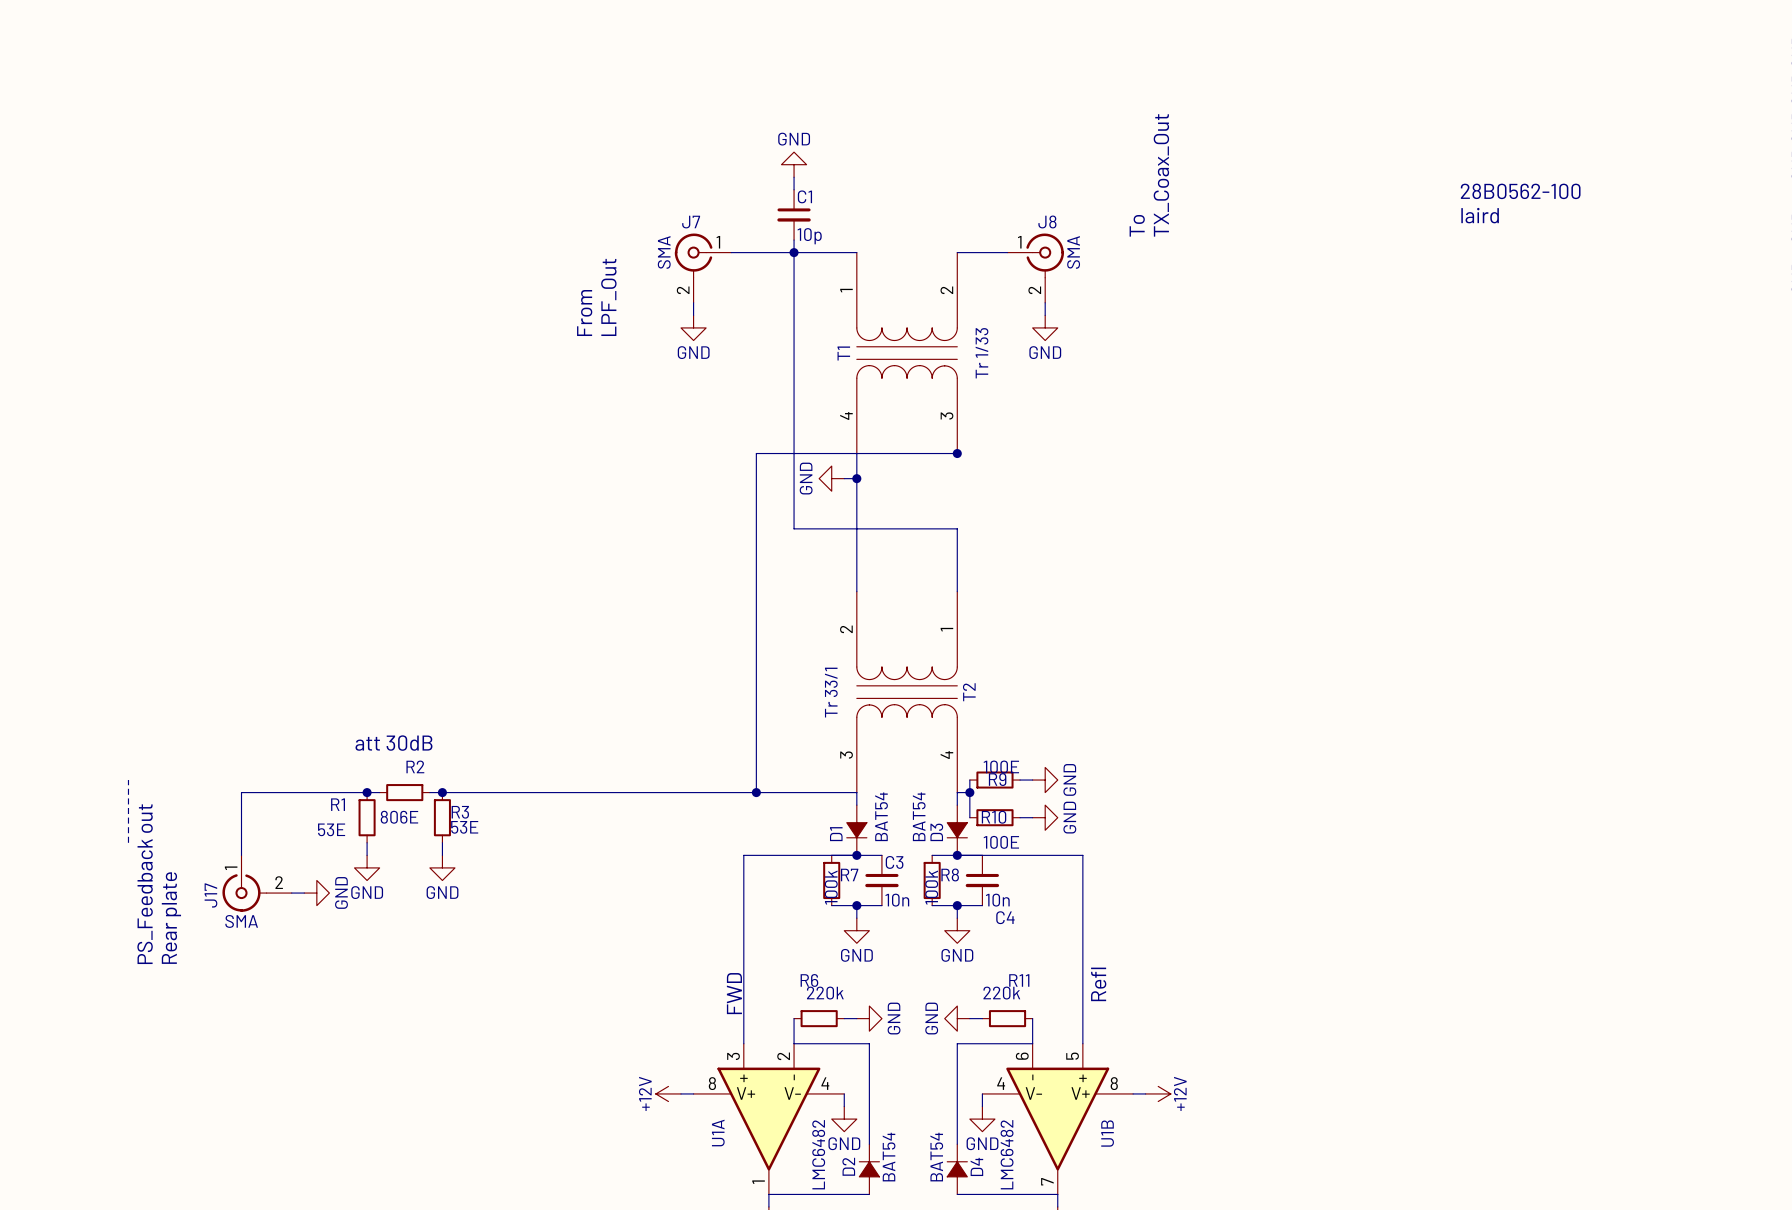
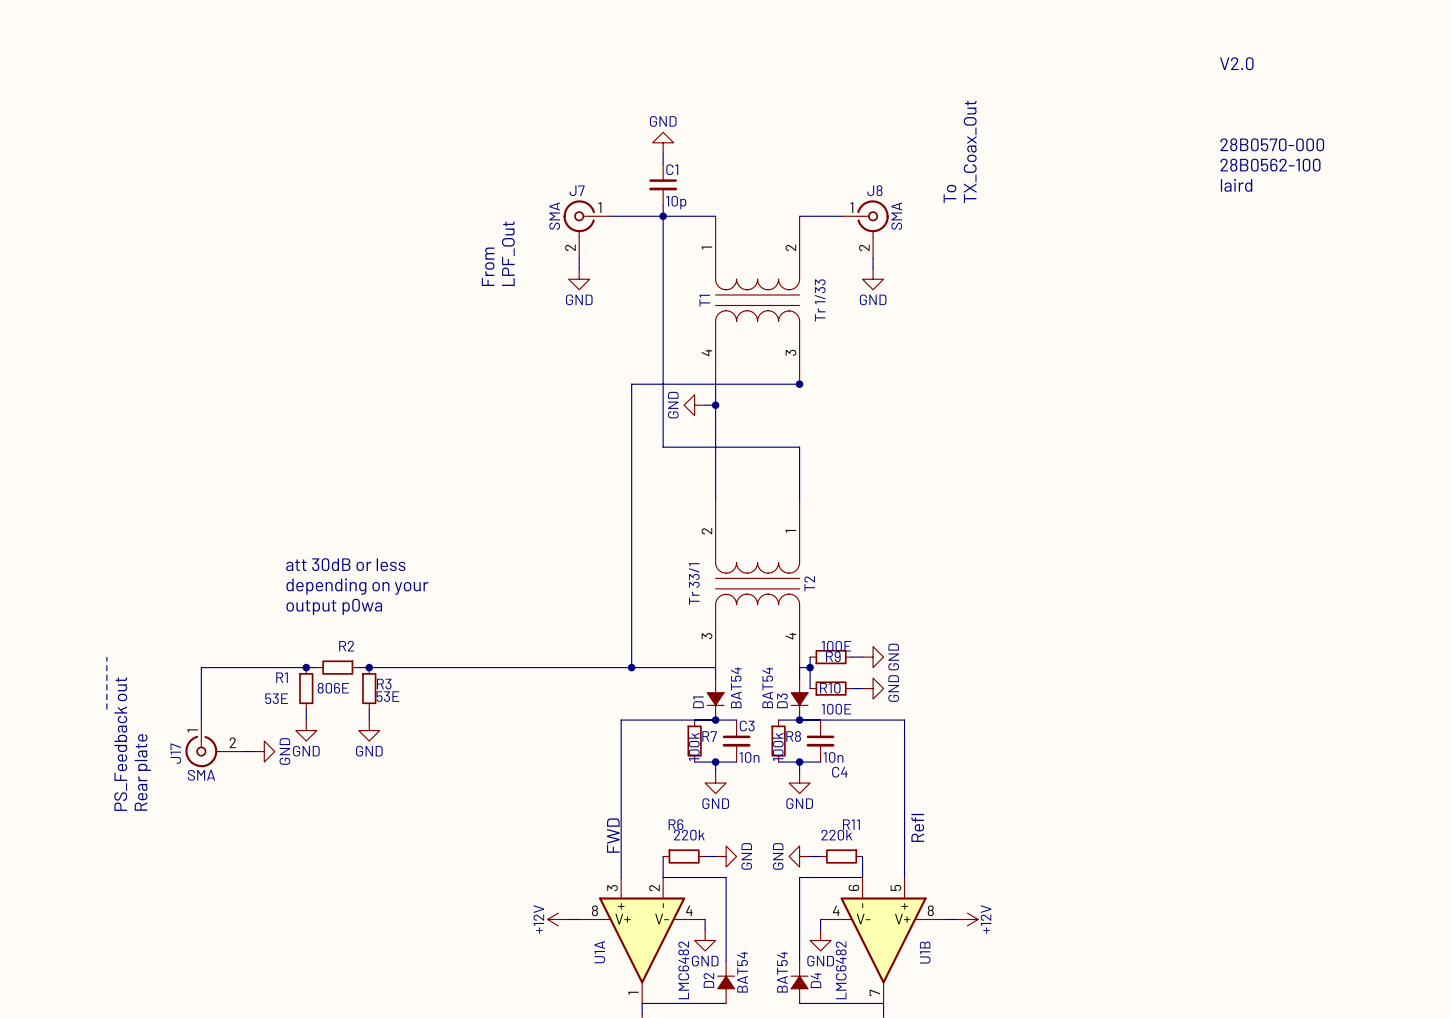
text: none -> V2.0 (1236, 63)
text: none -> 28B0570-000 (1272, 144)
text: none -> att 30dB or less (345, 564)
text: none -> depending on your (357, 586)
text: none -> output p0wa (334, 606)
text: att 30dB (393, 743) -> none

